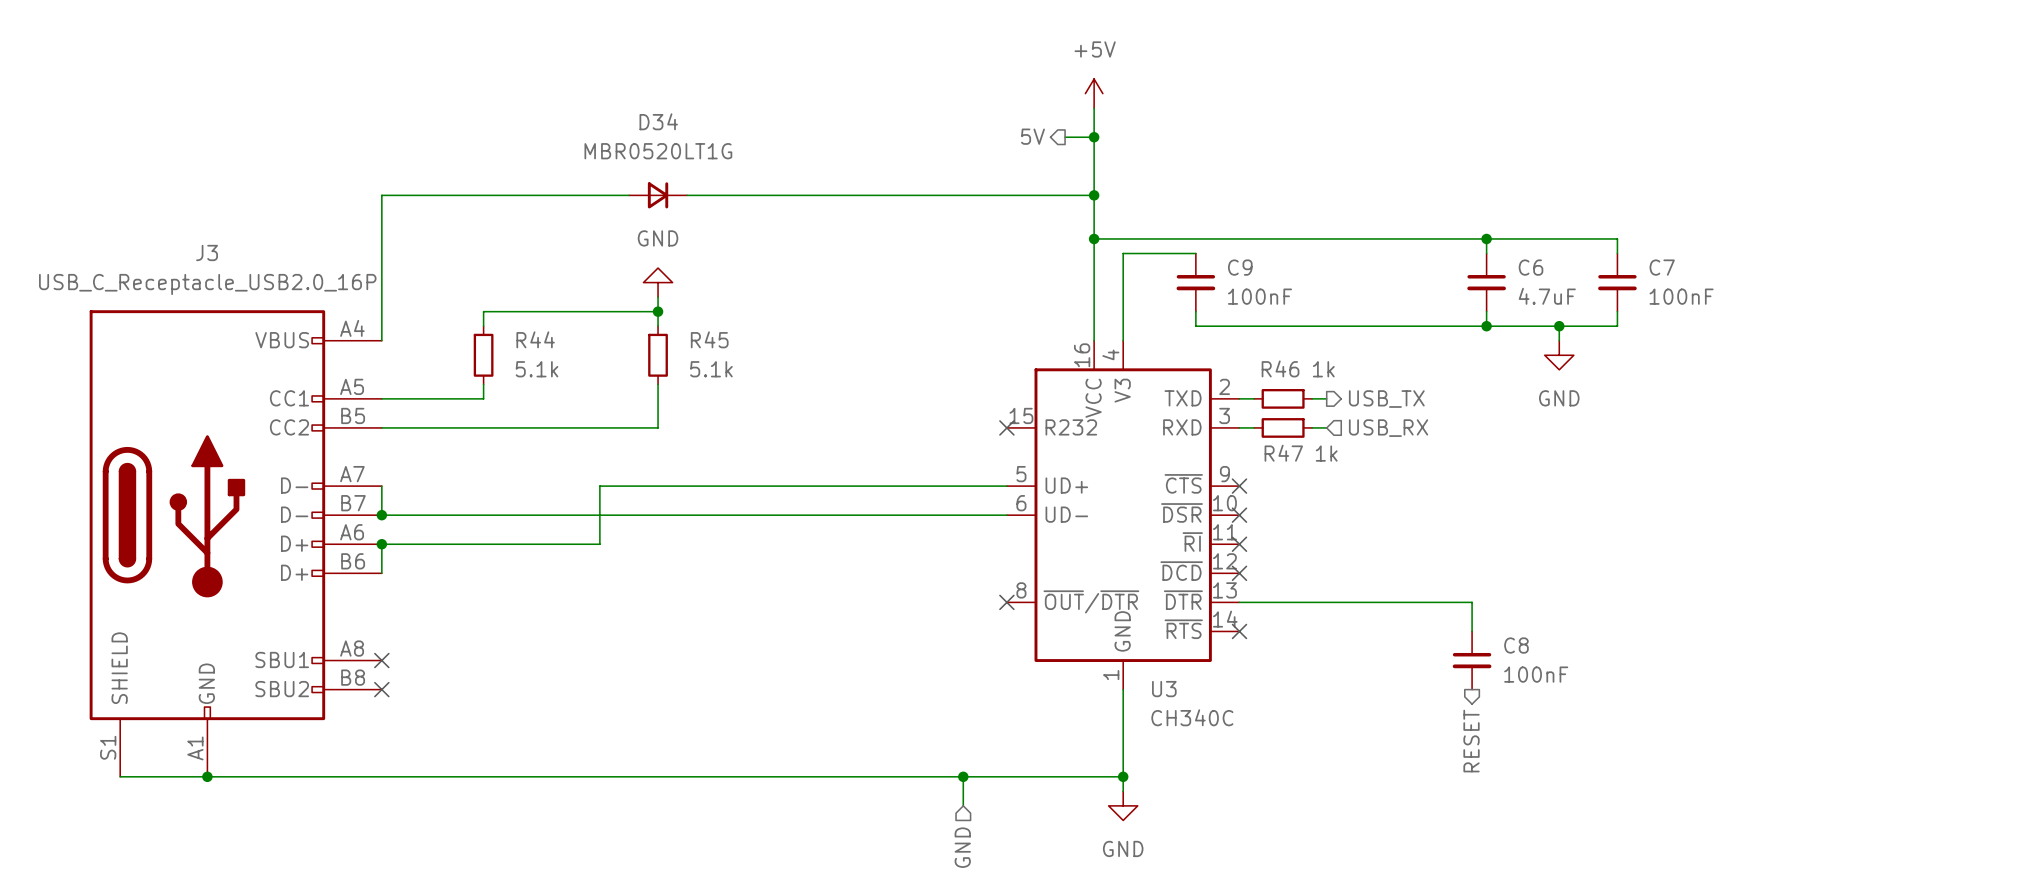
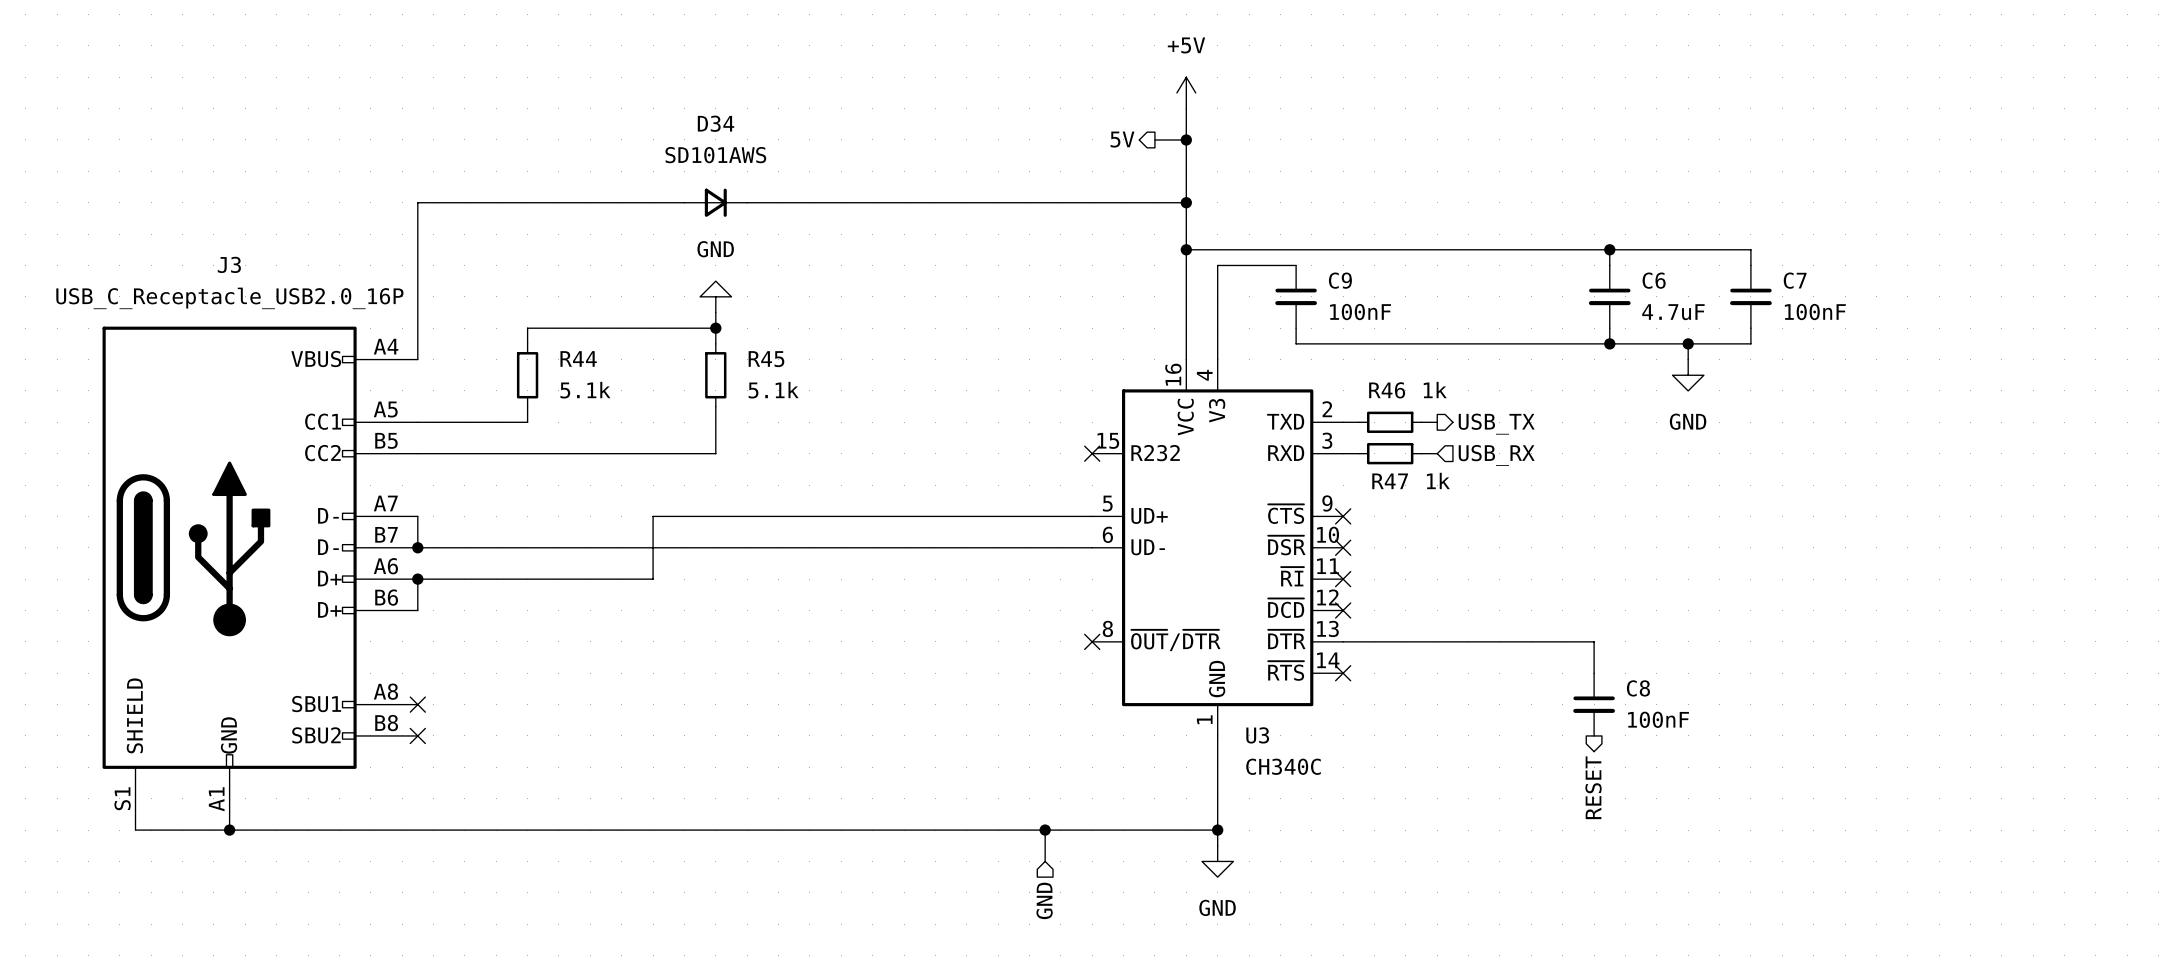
D34 value: MBR0520LT1G (658, 151) -> SD101AWS (715, 155)

